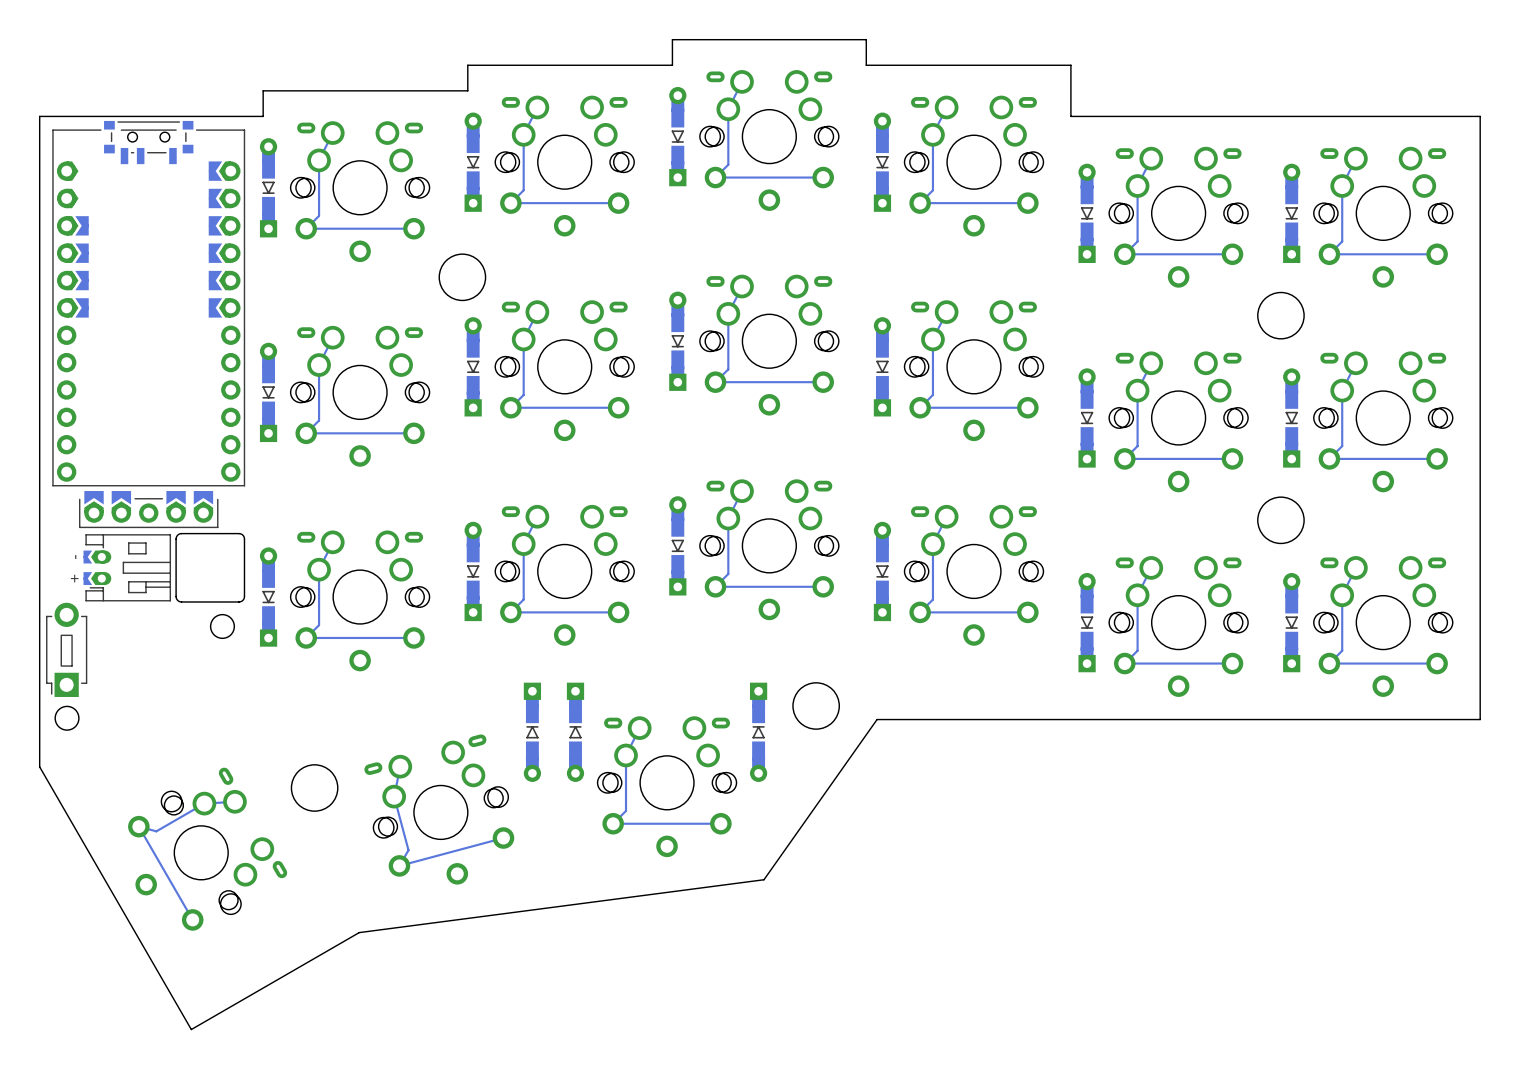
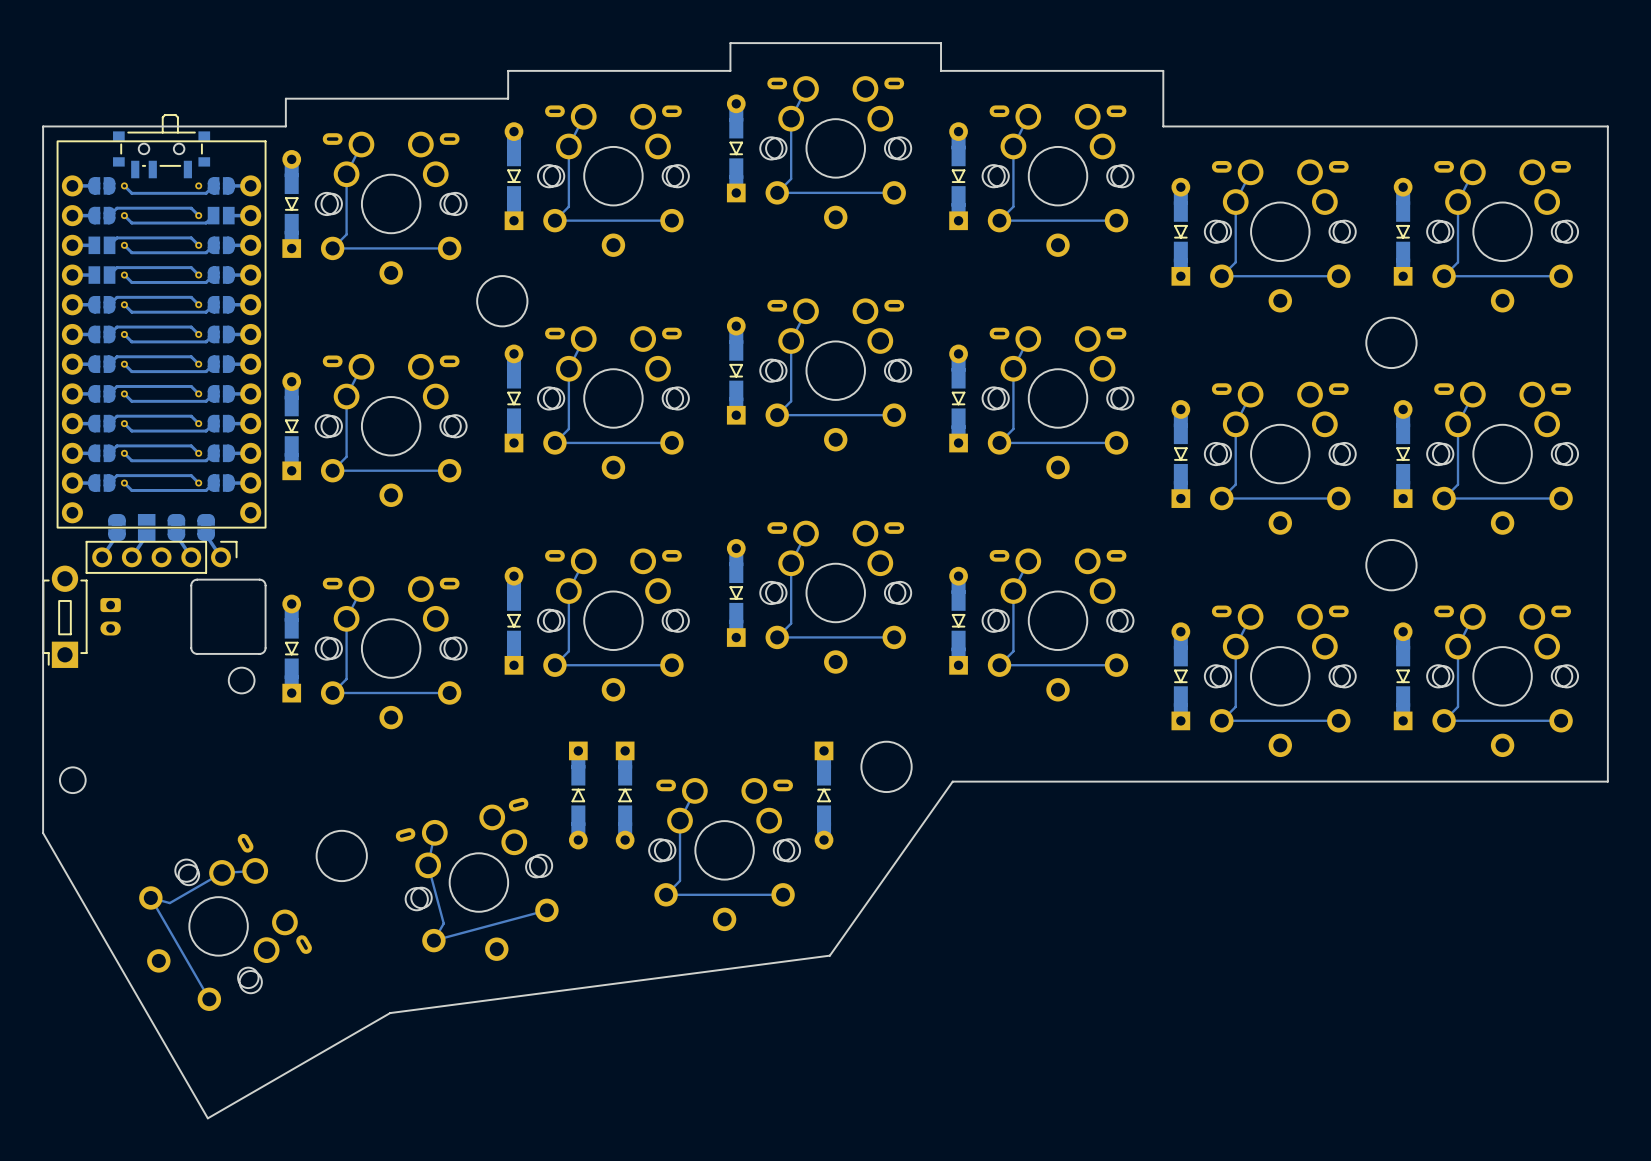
part footprint: [104, 120, 194, 165] -> [113, 114, 211, 179]
part footprint: [52, 129, 246, 487] -> [56, 140, 267, 529]
part footprint: [79, 491, 219, 529] -> [85, 514, 238, 574]
part: none -> (110, 616)
part: (127, 567) -> none
part position: (66, 649) -> (64, 616)

